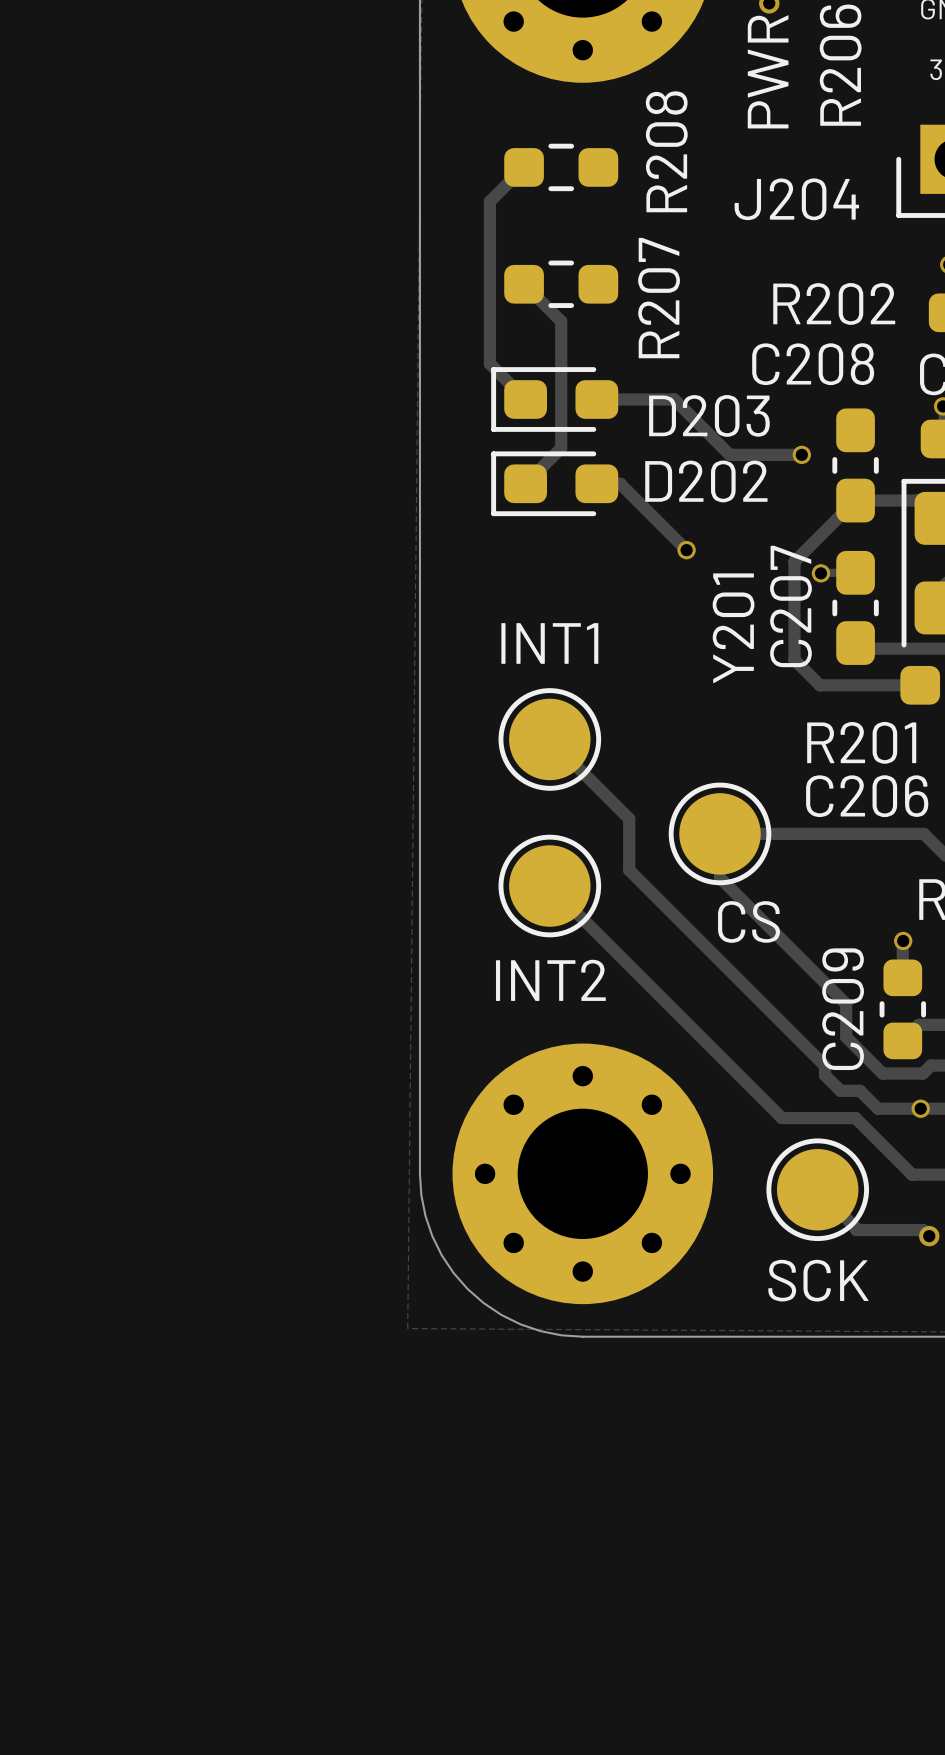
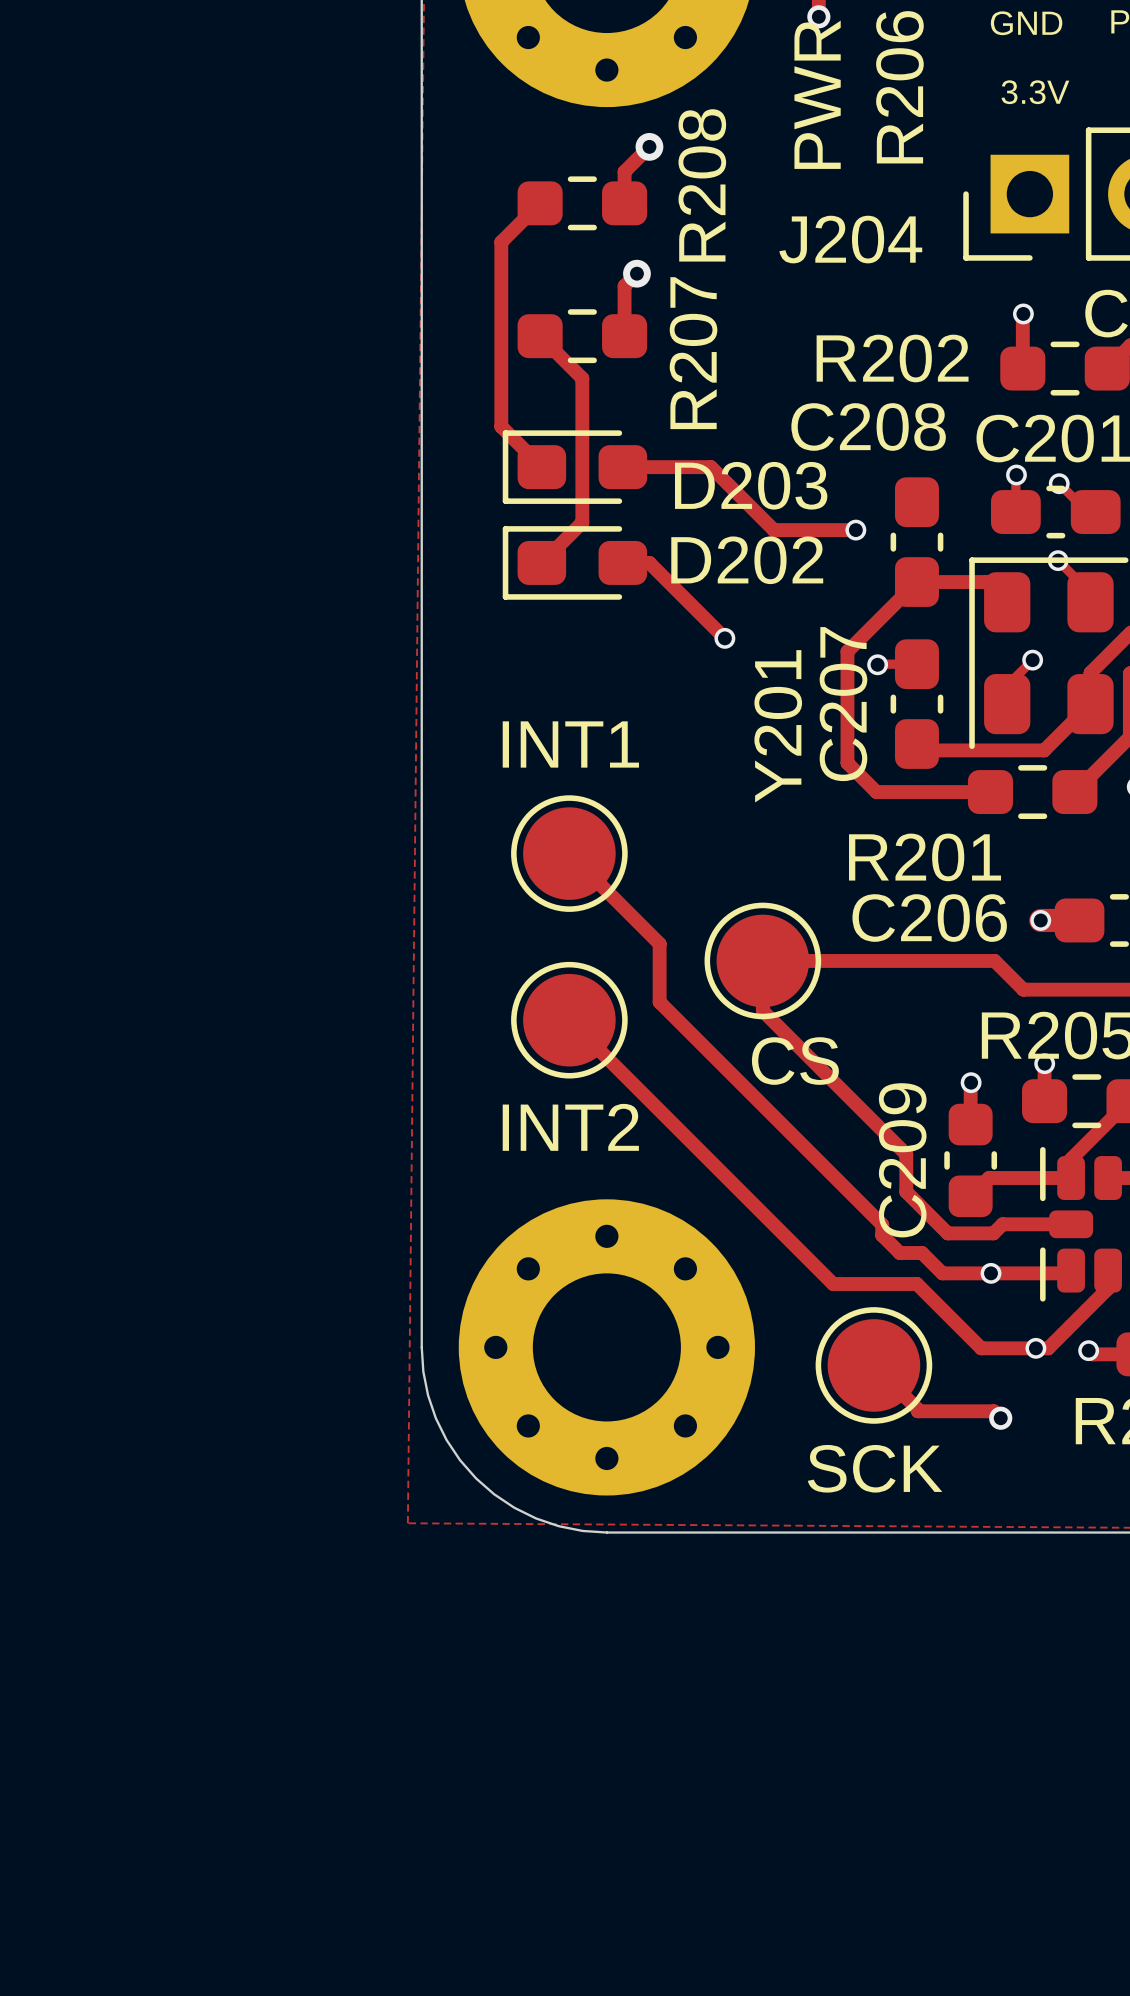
track: none -> (649, 146) (624, 171) (624, 203)
via: none -> (649, 146)
track: none -> (636, 273) (624, 286) (624, 336)
via: none -> (636, 273)

